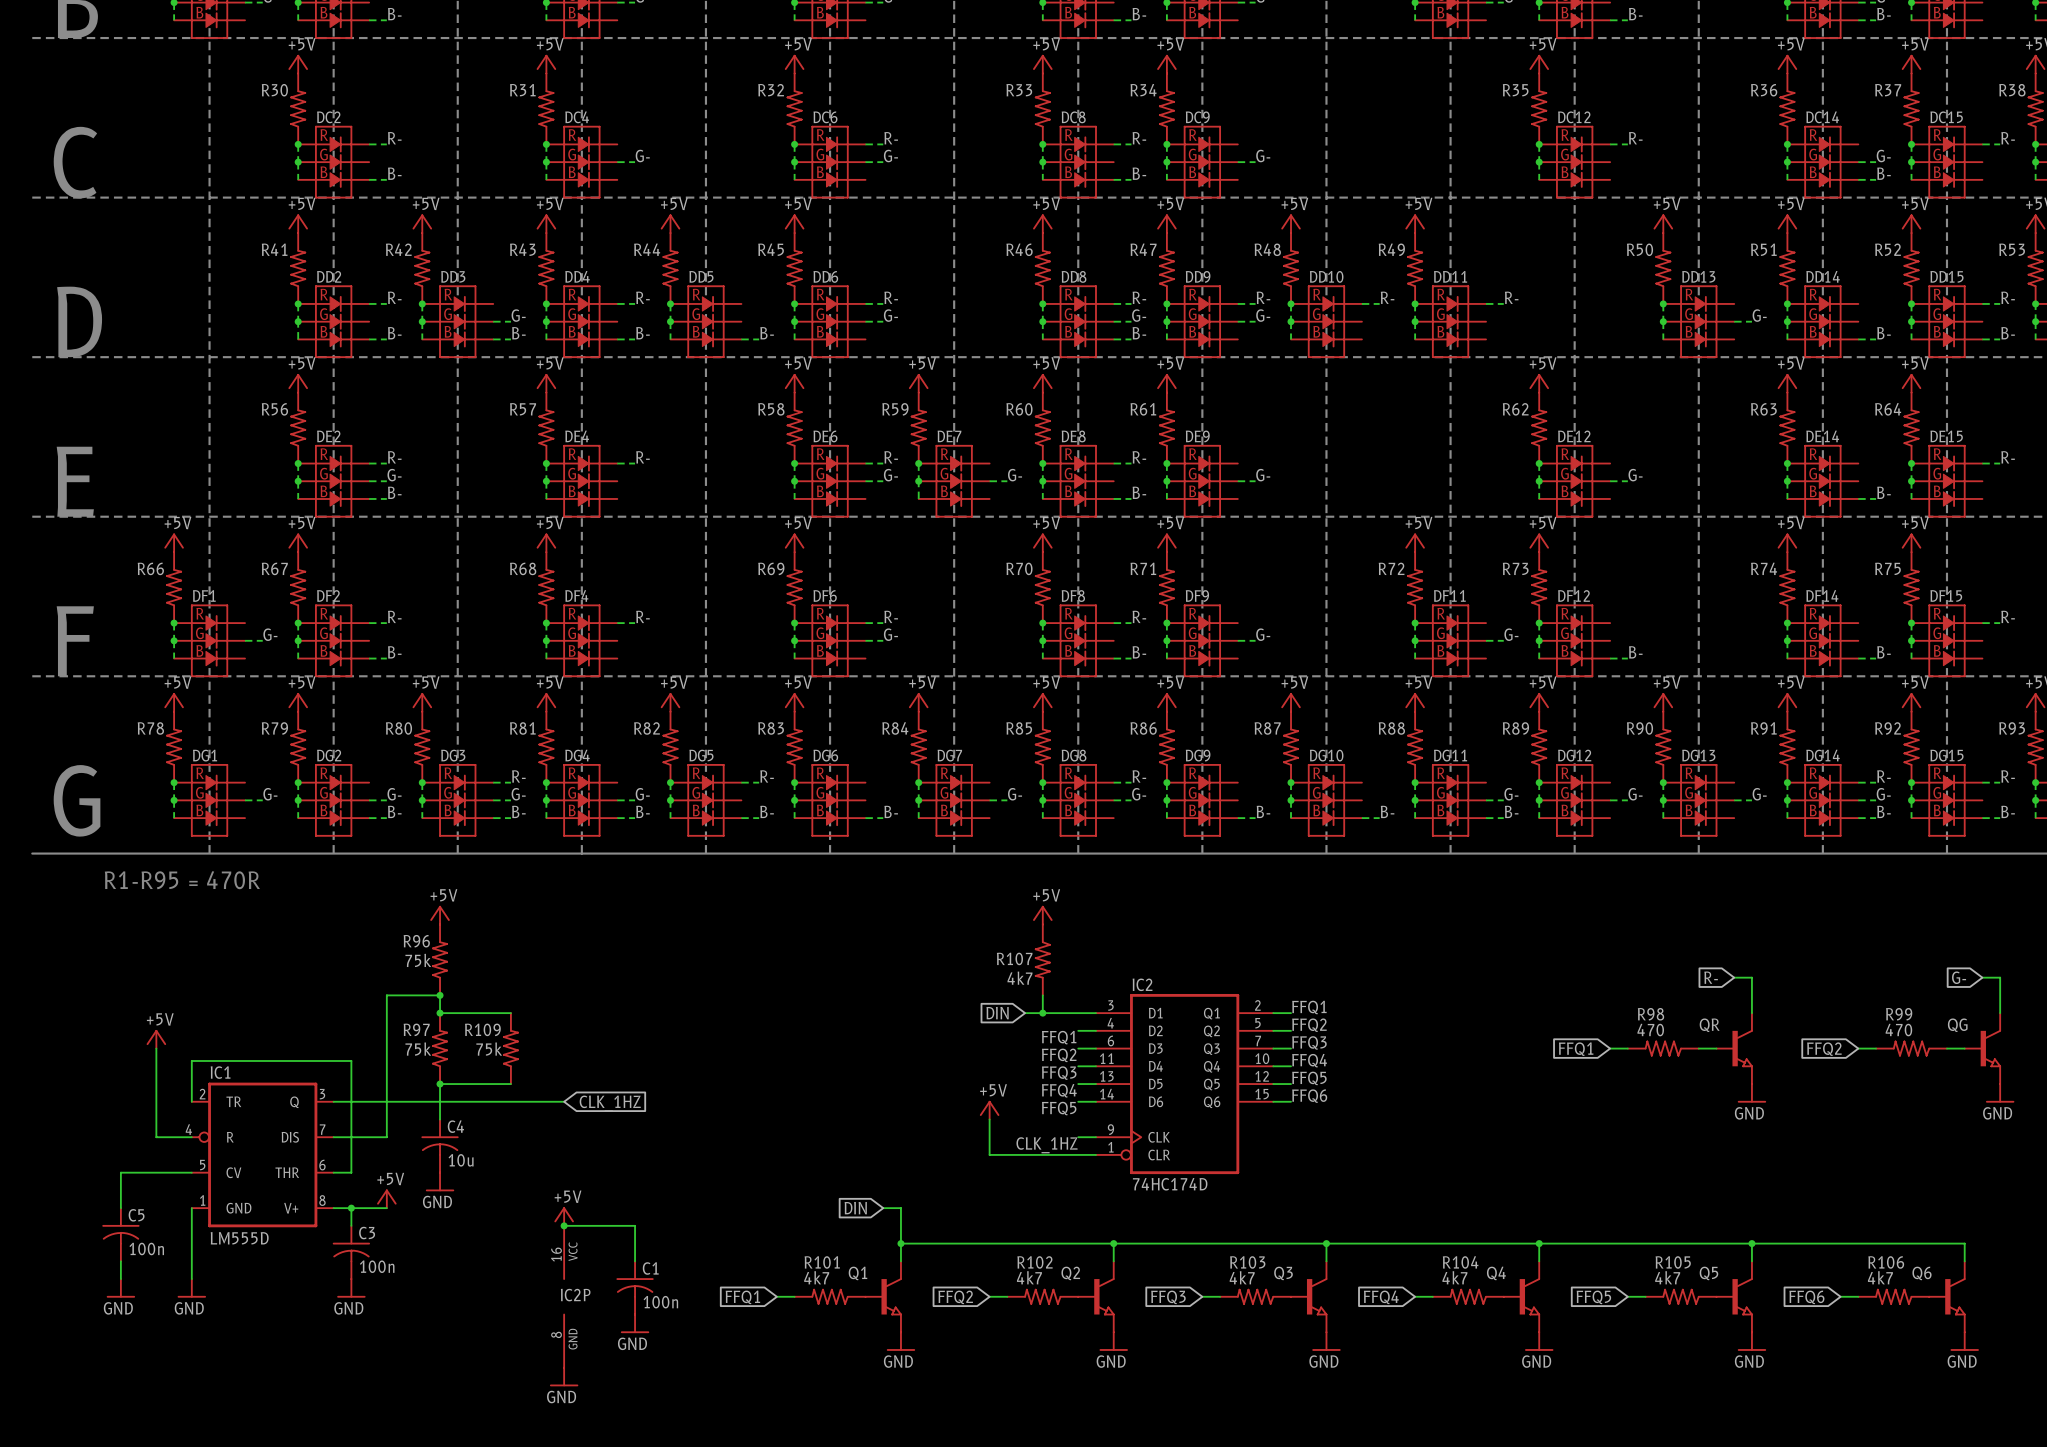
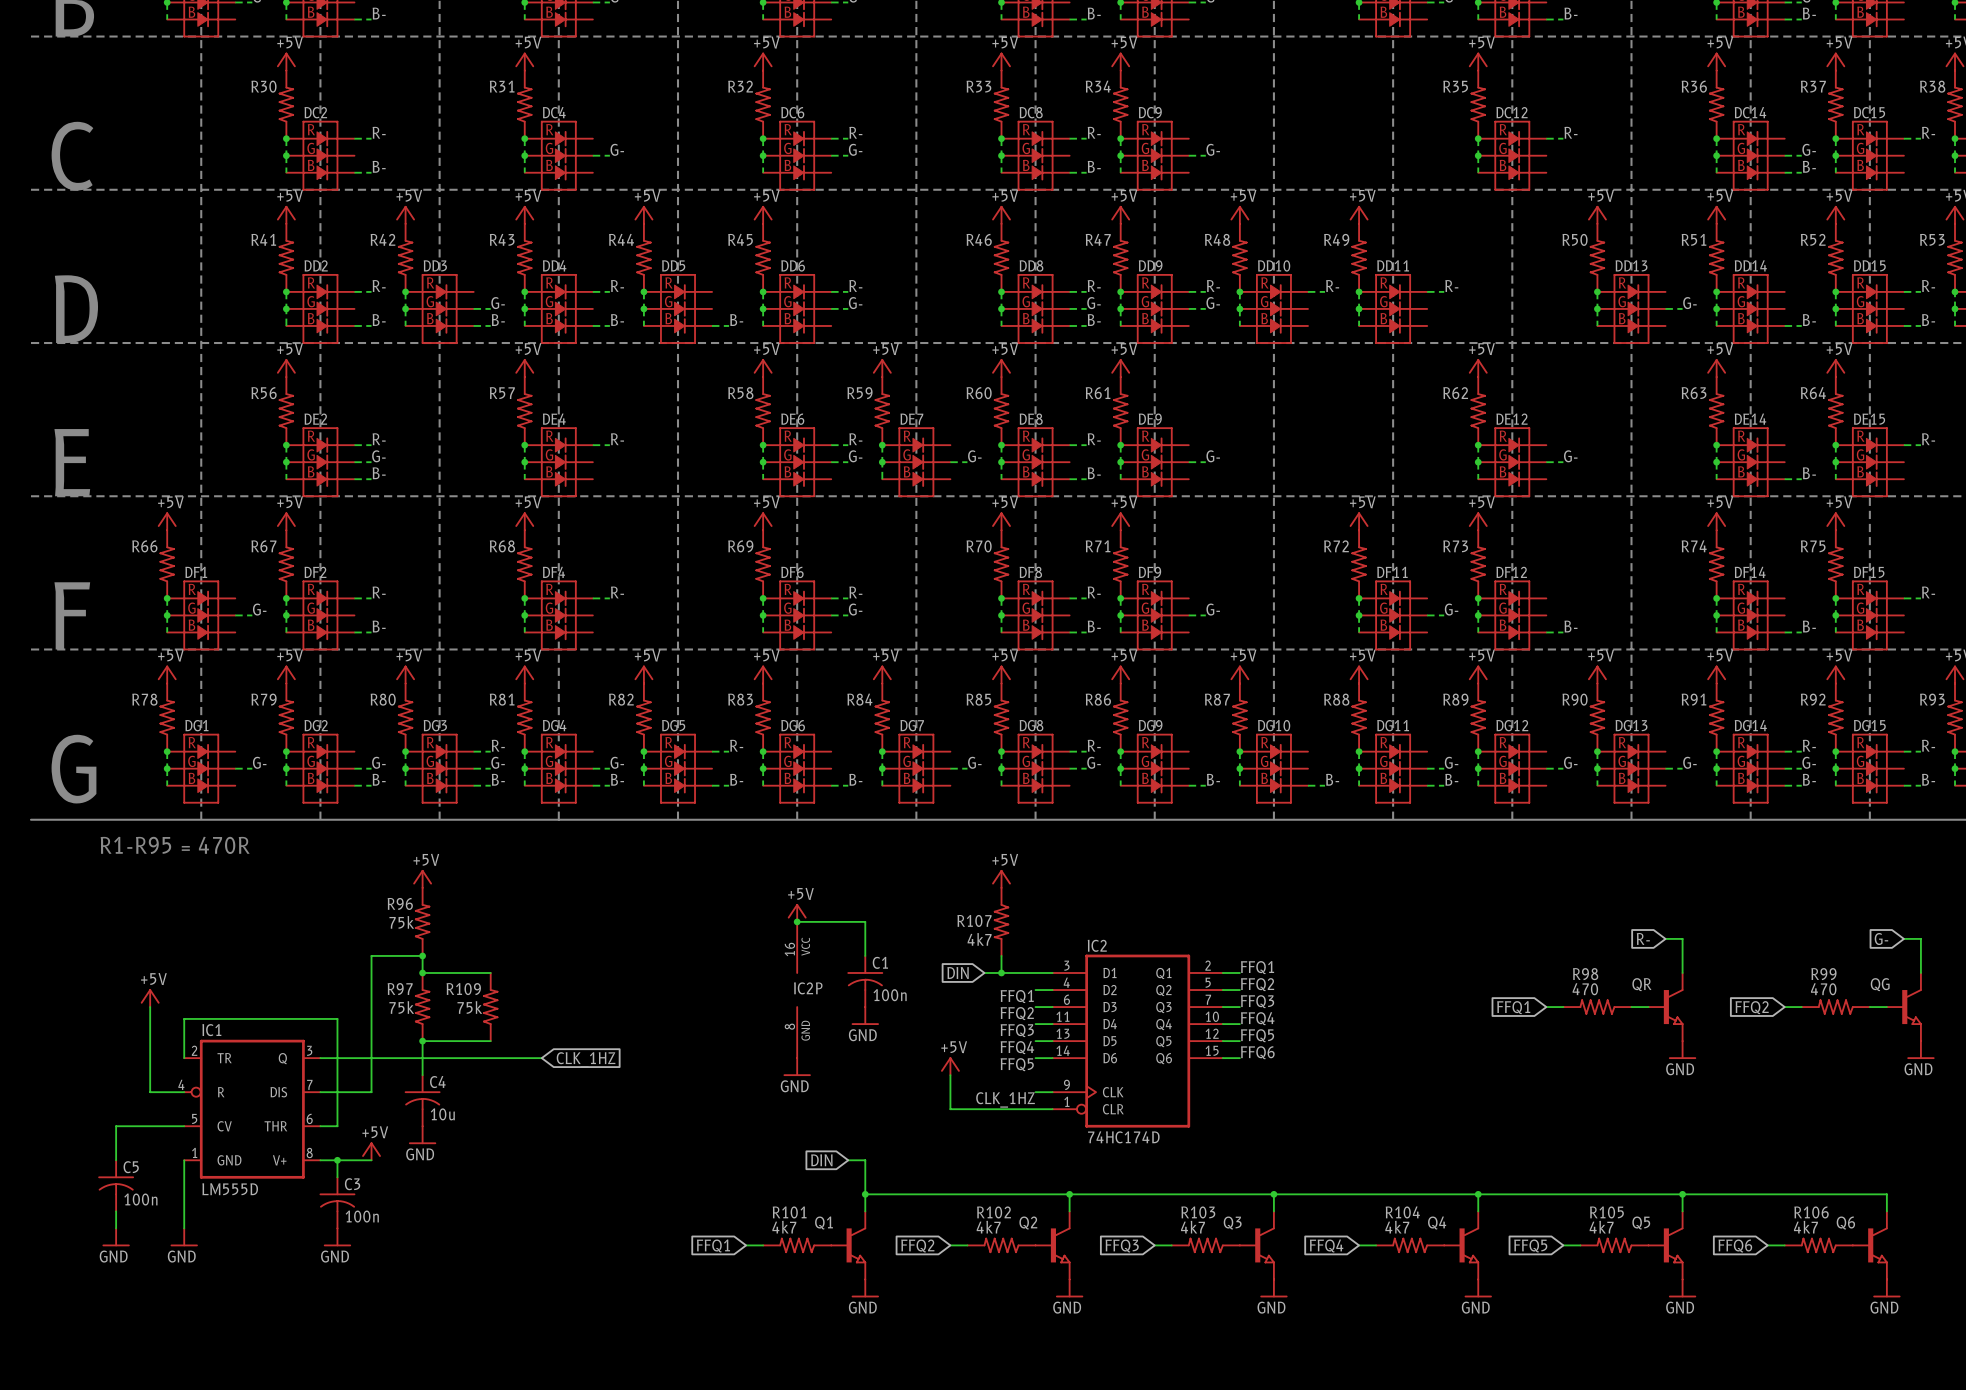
power symbol: none -> +5V (797, 912)
wire: none -> (797, 921) (865, 921) (865, 955)
junction: none -> (797, 921)
power symbol: none -> GND (865, 1015)
power symbol: none -> GND (797, 1067)
power symbol: +5V (564, 1216) -> none
wire: (564, 1225) (635, 1225) (635, 1261) -> none
junction: (564, 1225) -> none
C1 position: (635, 1287) -> (865, 981)
IC2P position: (564, 1296) -> (797, 990)
power symbol: GND (635, 1323) -> none
power symbol: GND (564, 1377) -> none

